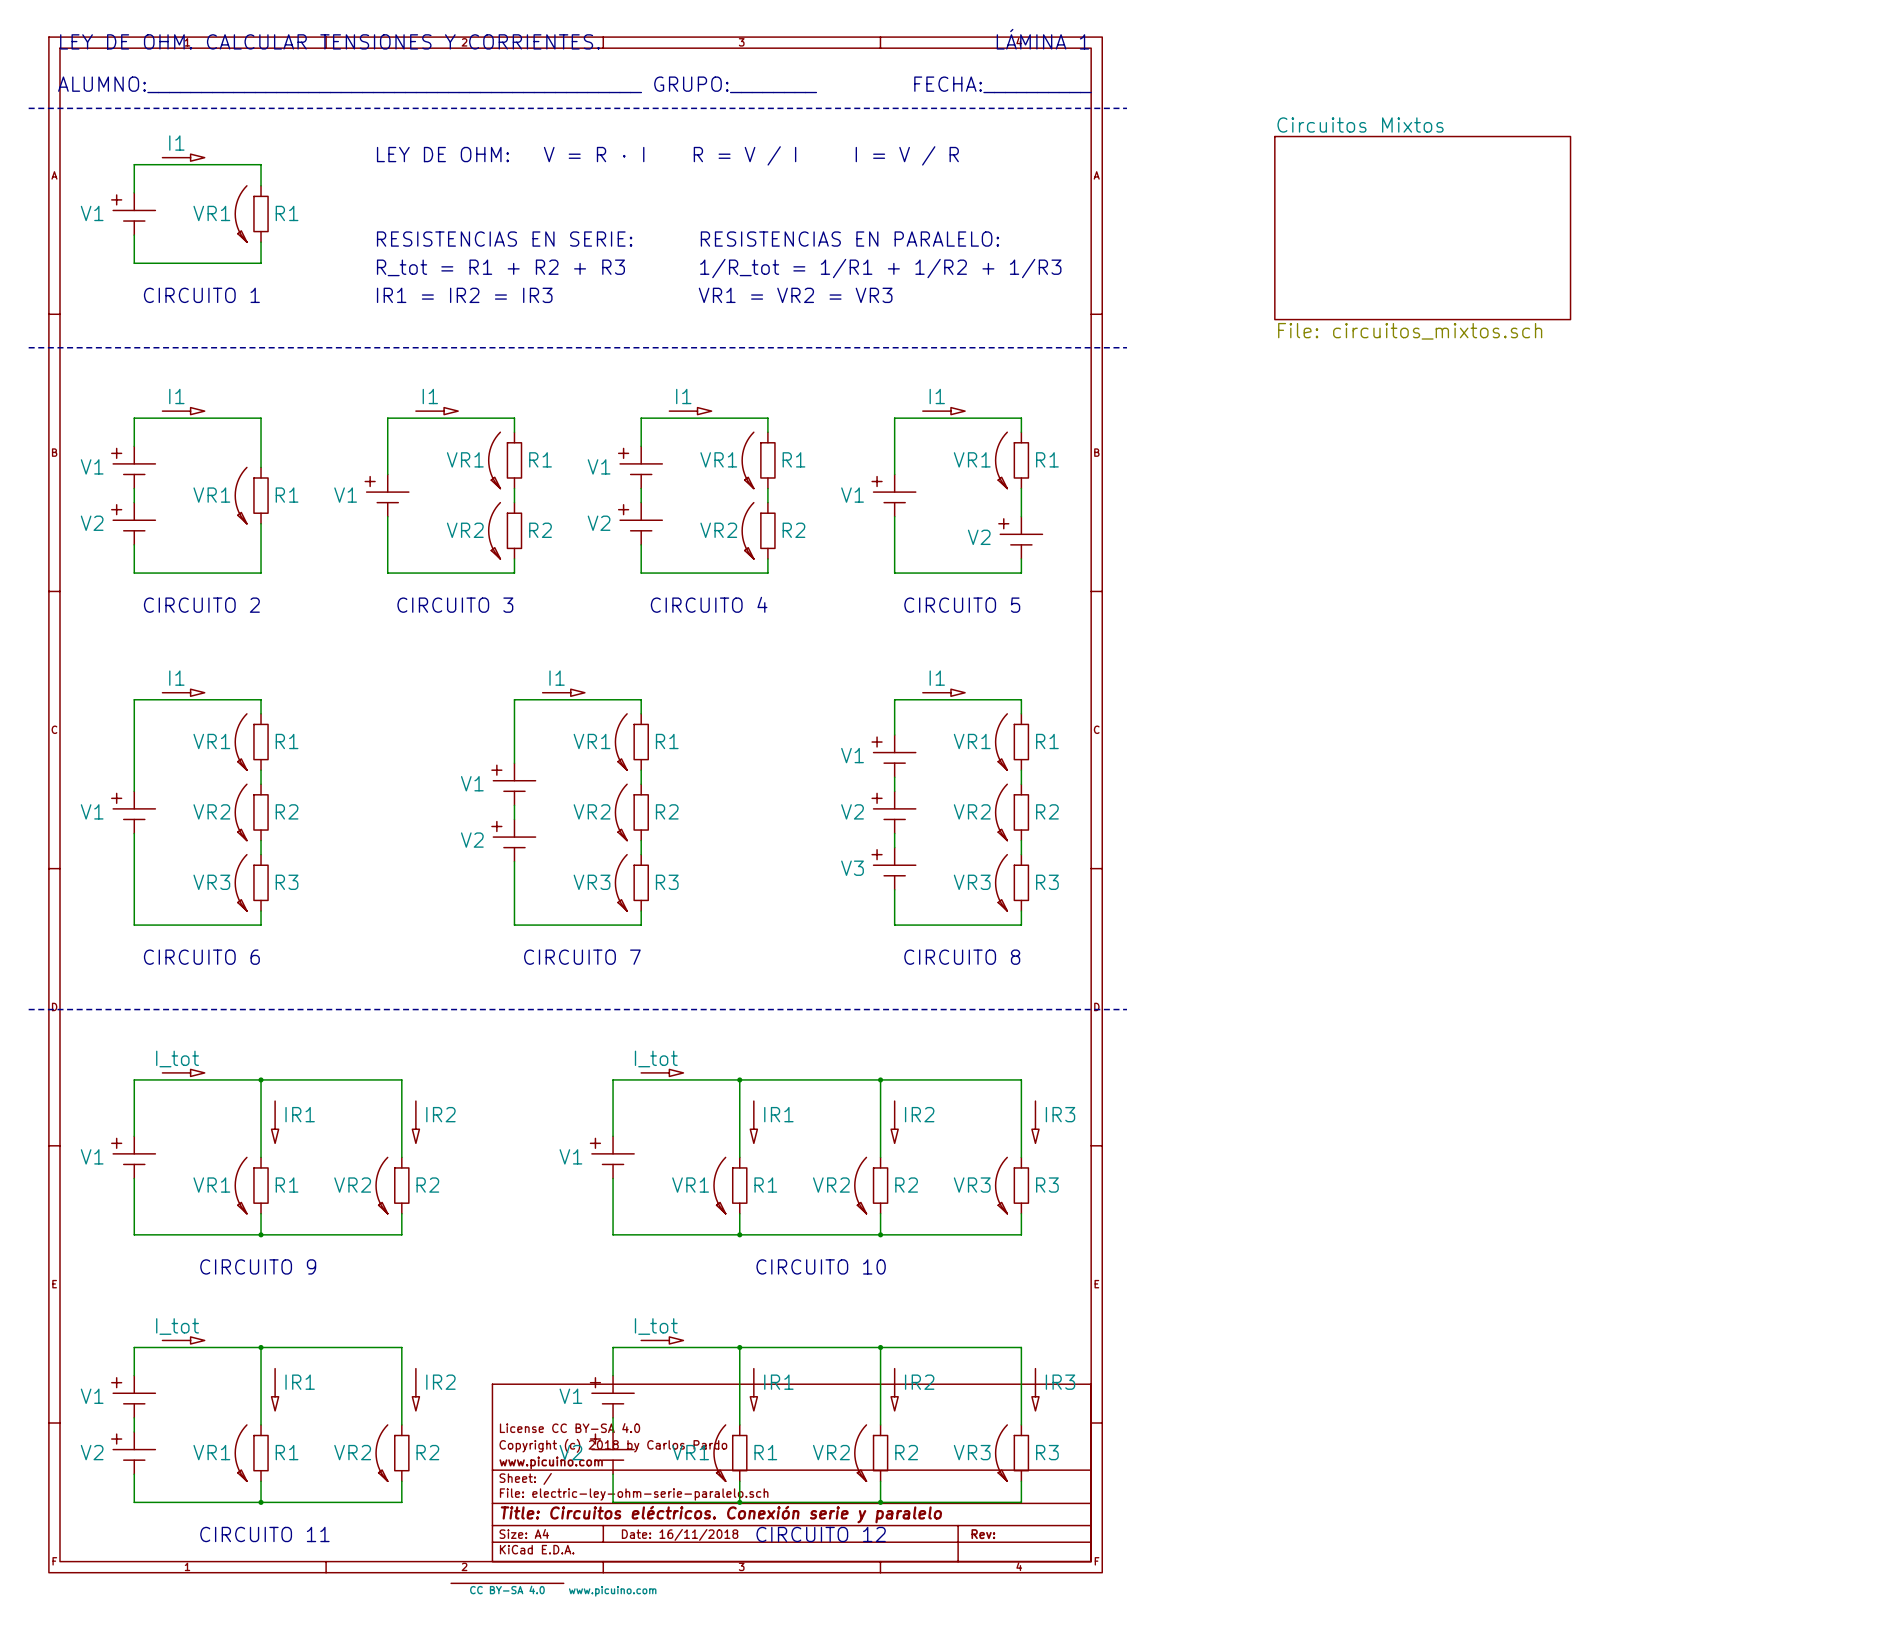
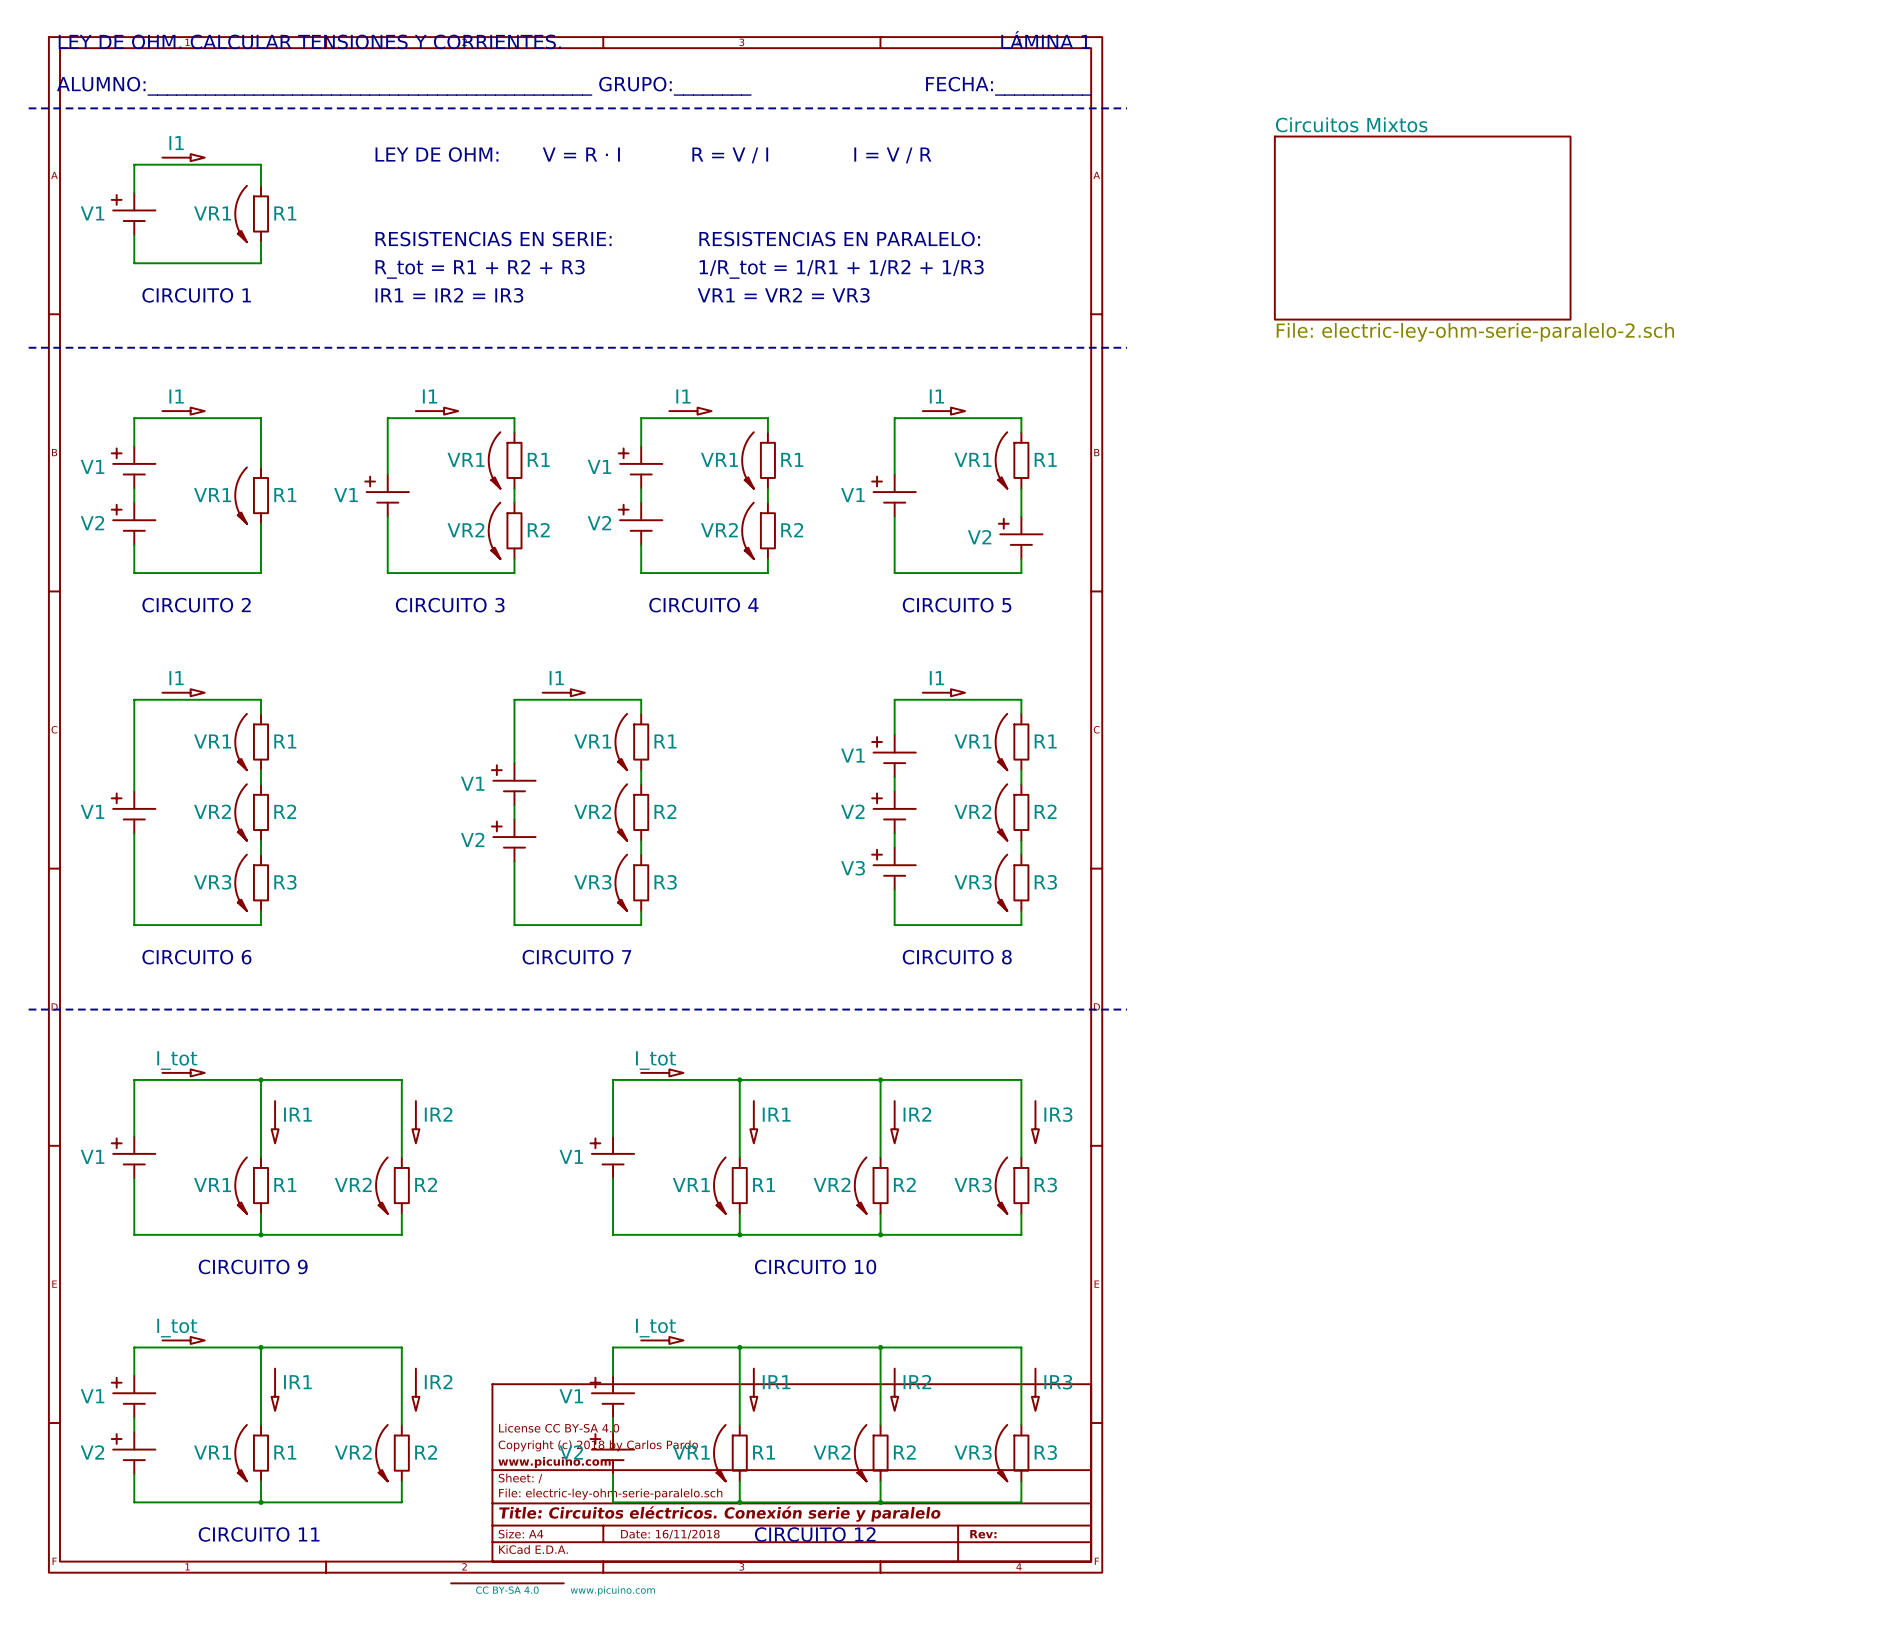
sheet Circuitos Mixtos value: File: circuitos_mixtos.sch (1410, 331) -> File: electric-ley-ohm-serie-paralelo-2.sch (1475, 332)

